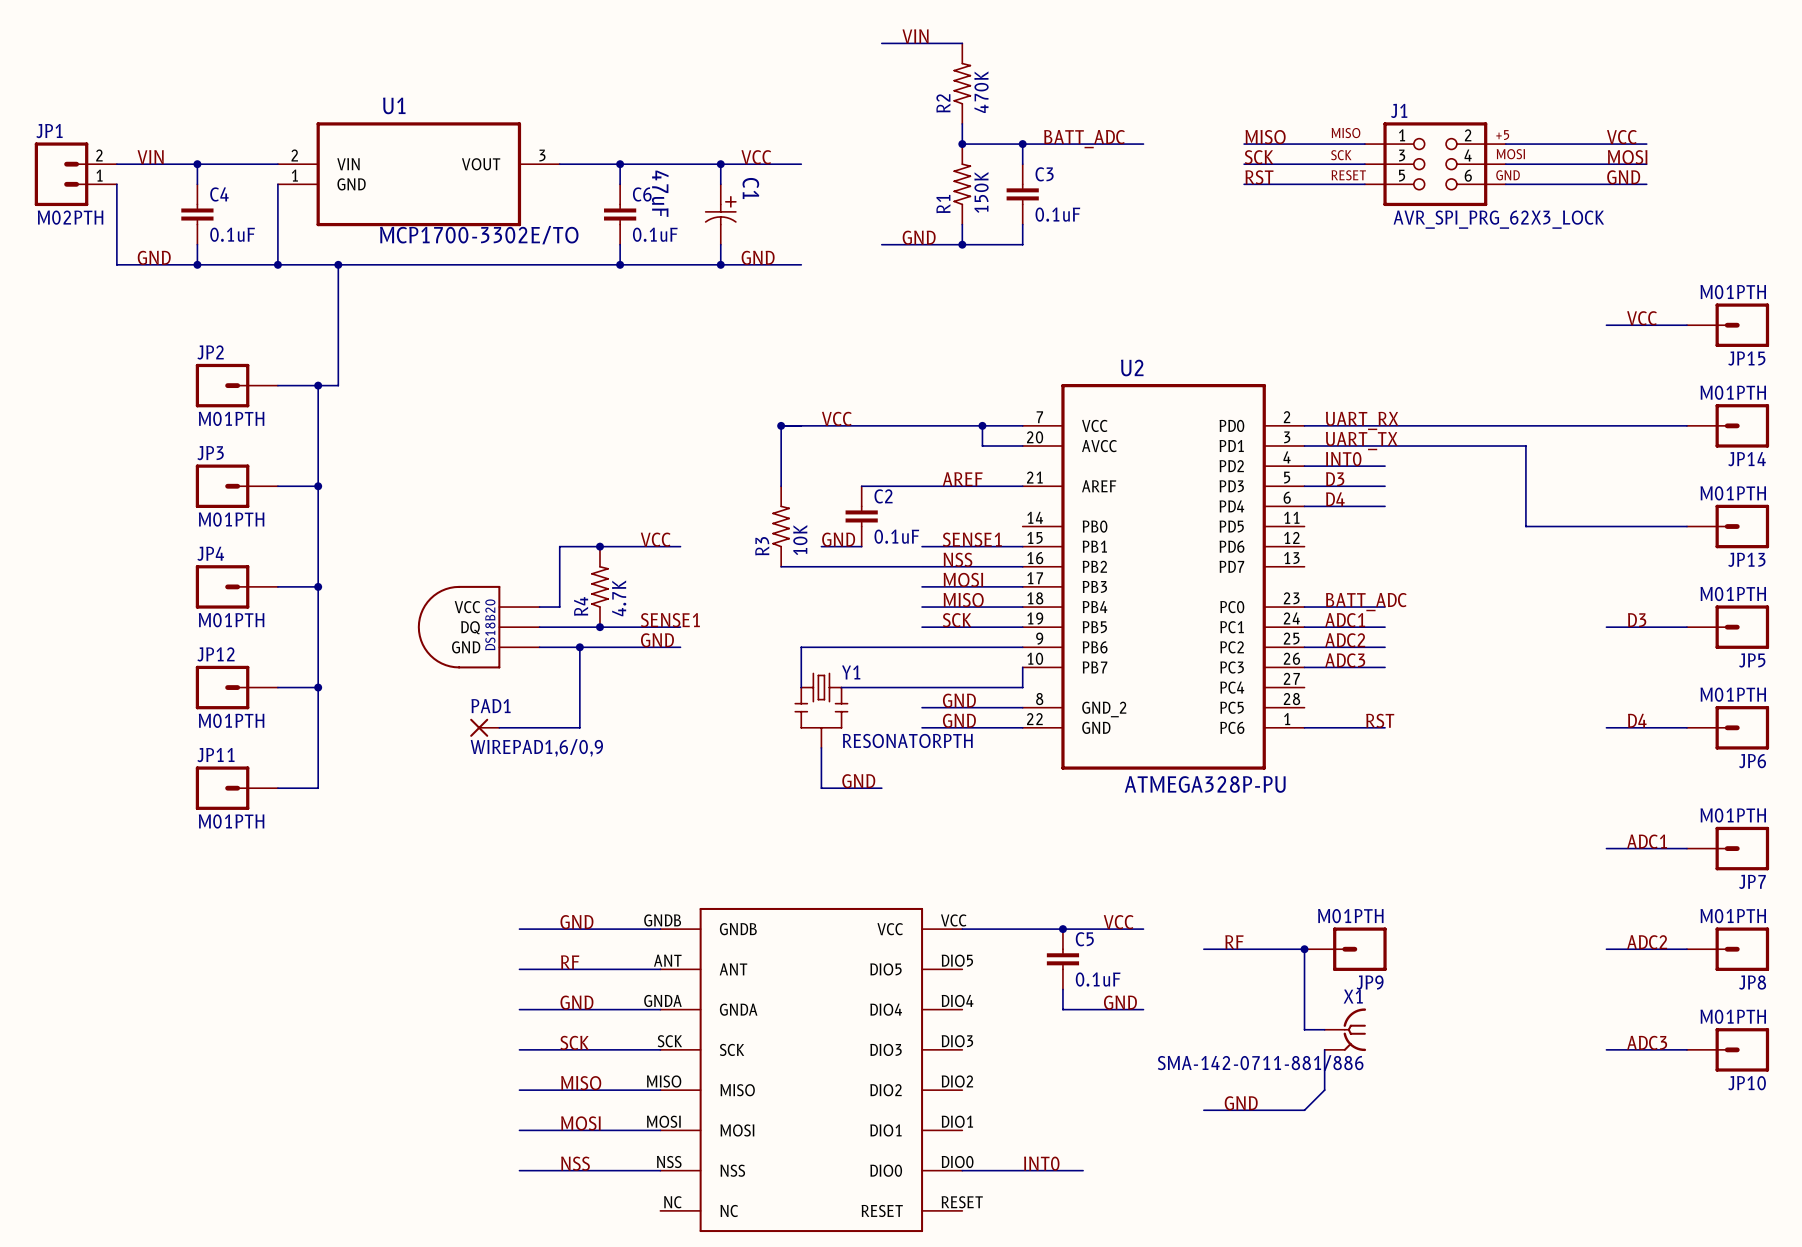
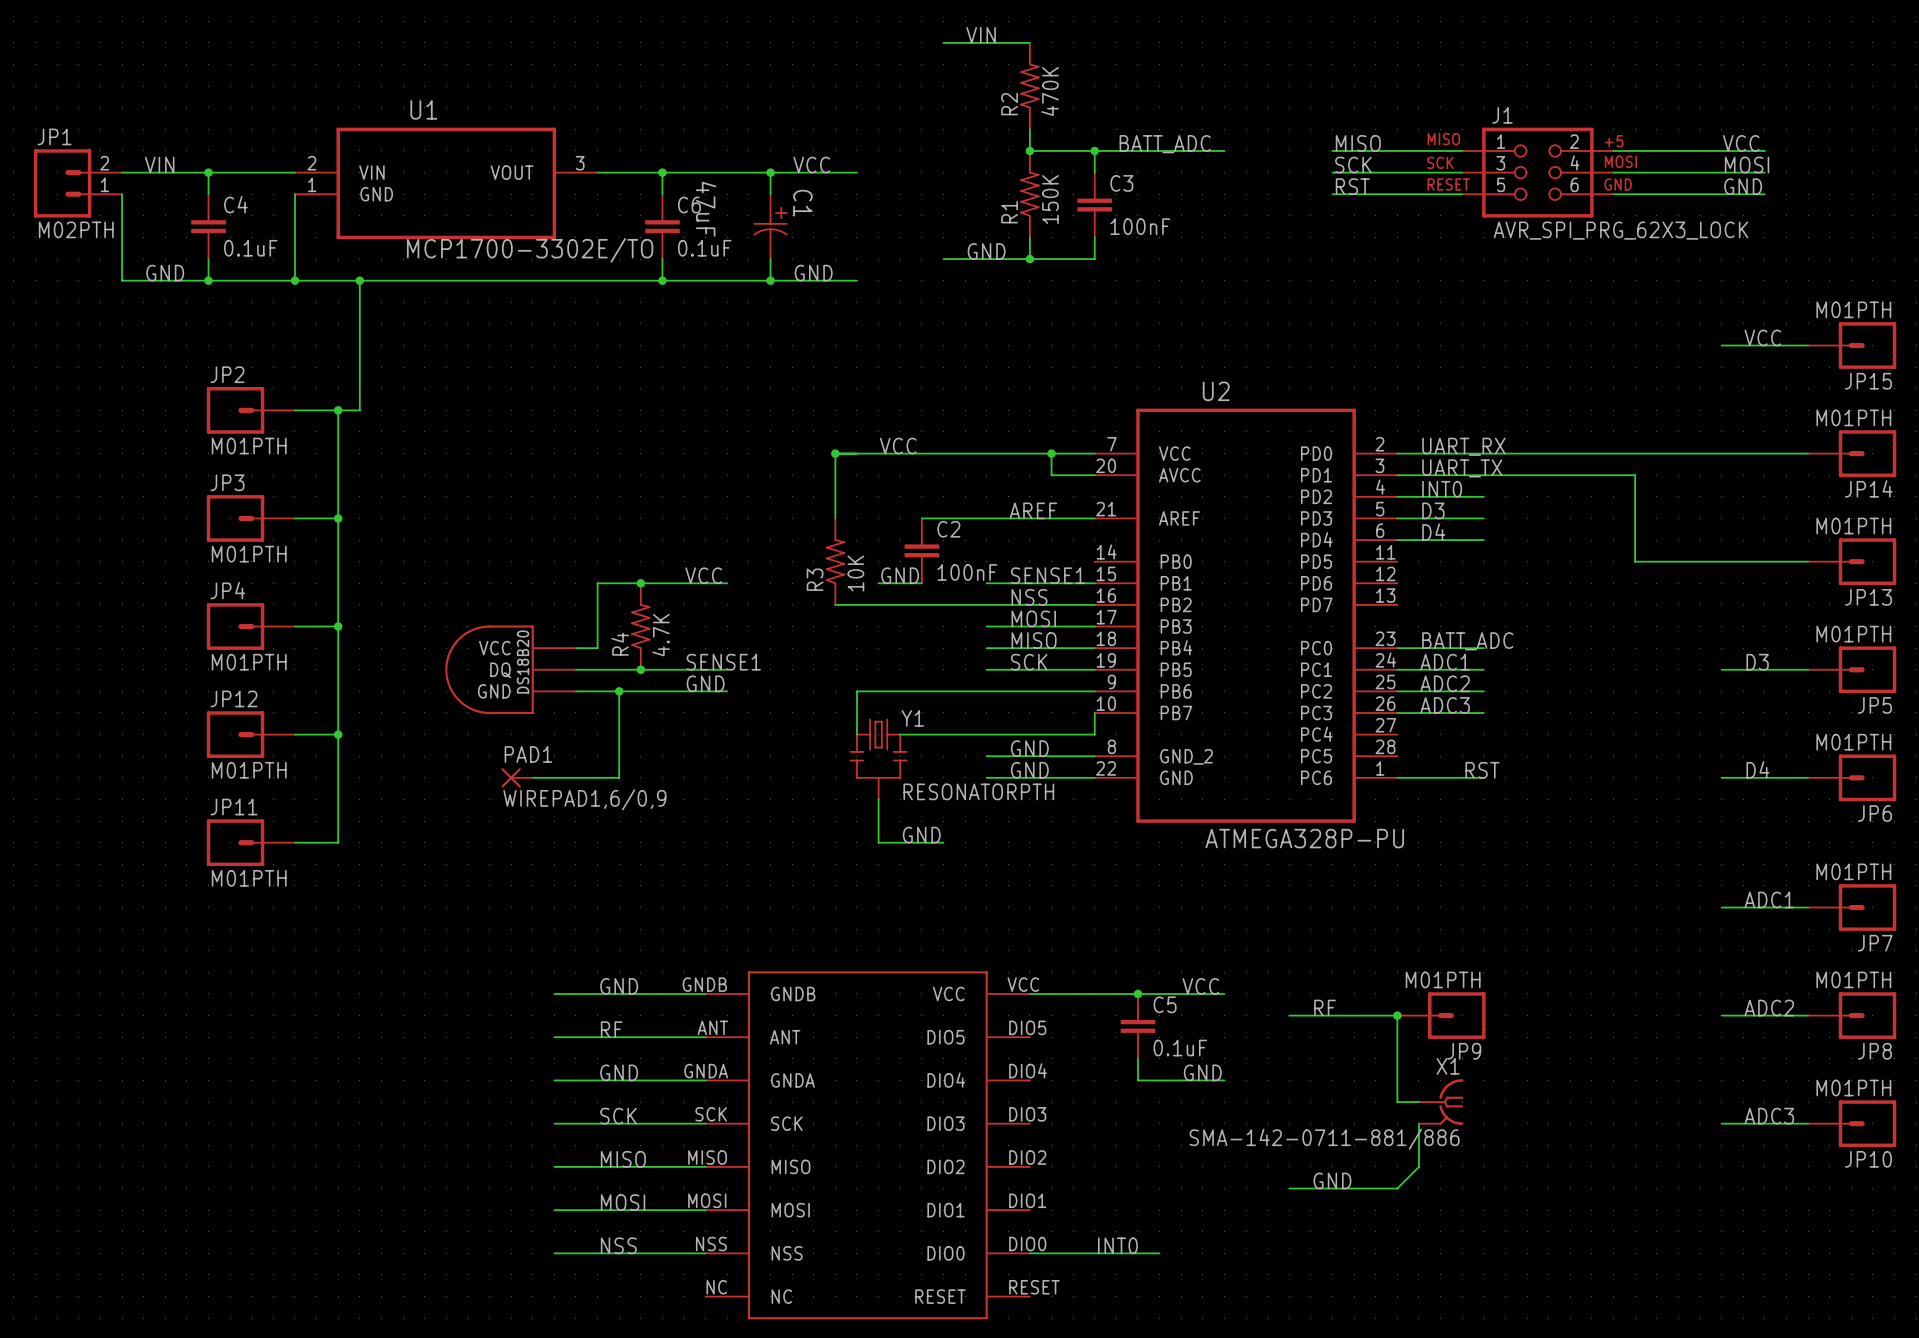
C3 value: 0.1uF (1057, 214) -> 100nF (1140, 226)
C2 value: 0.1uF (896, 536) -> 100nF (967, 572)

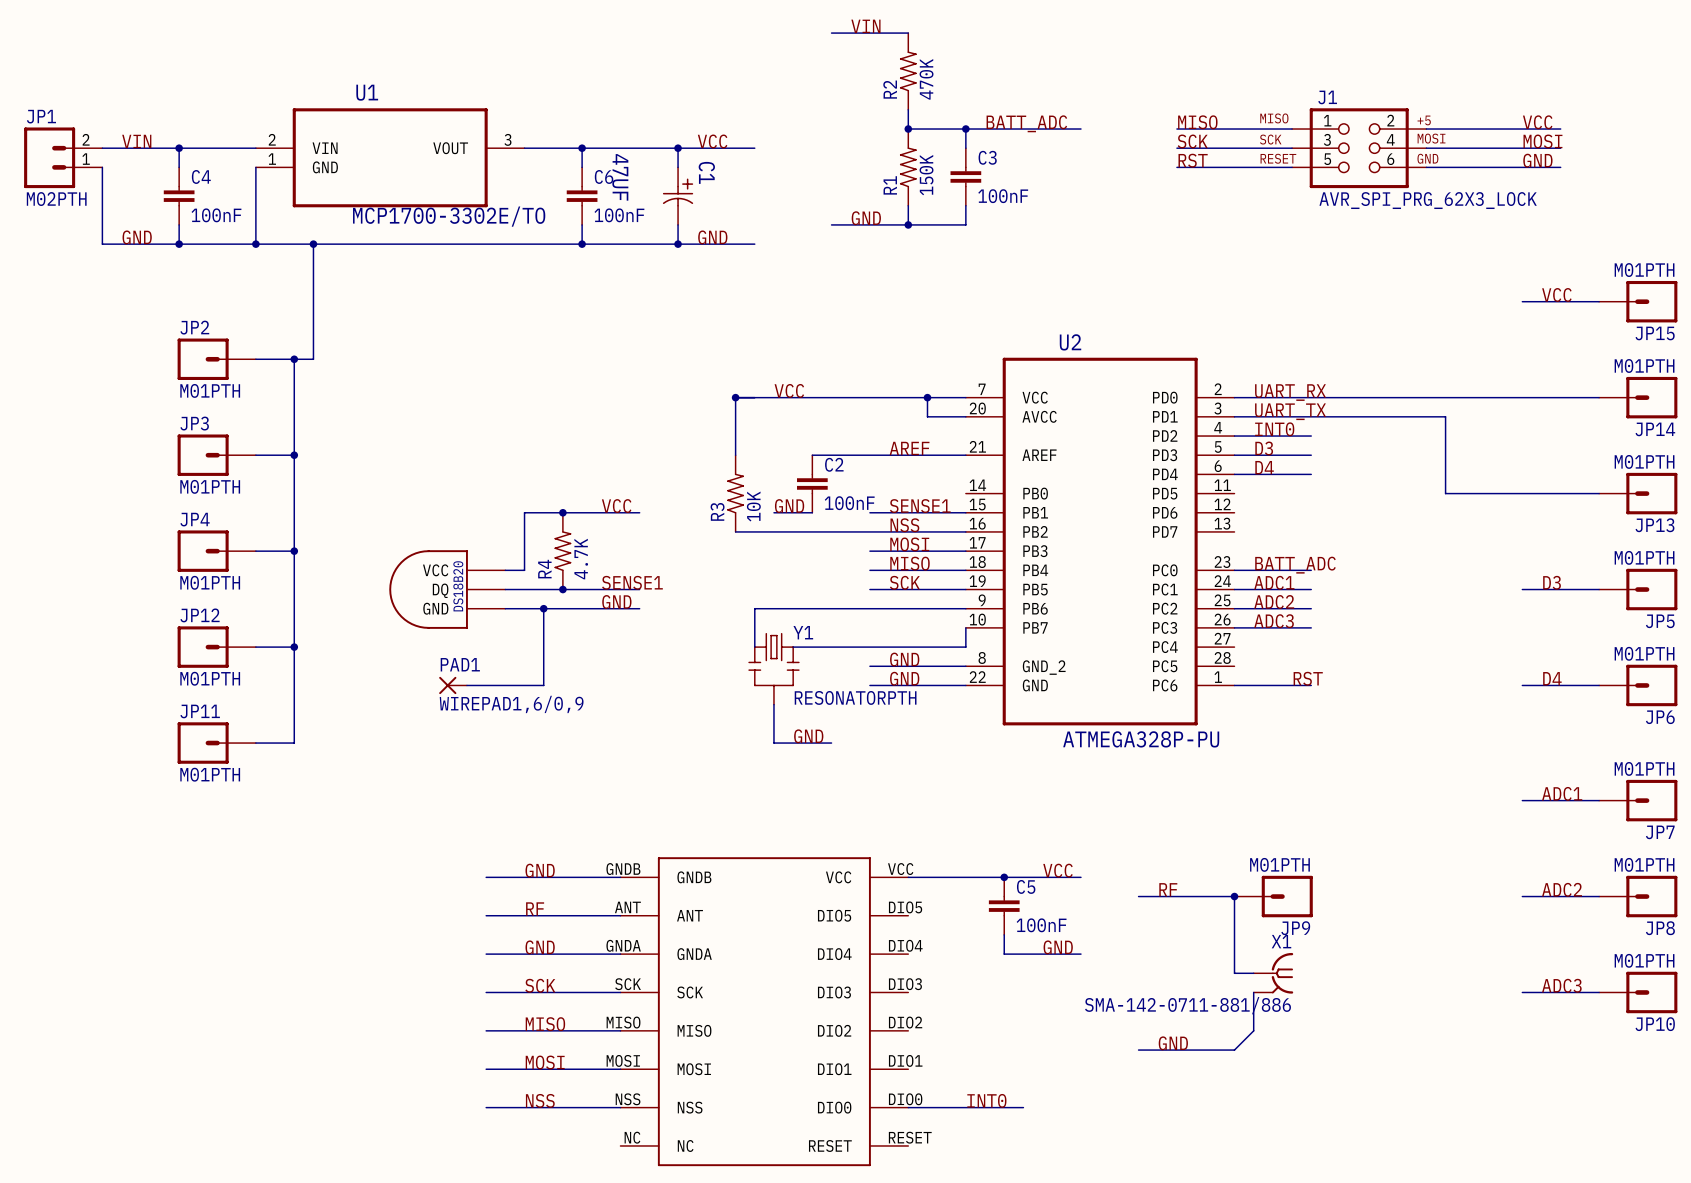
C1 value: 47uF (706, 209) -> 47UF (620, 177)
C4 value: 0.1uF (250, 248) -> 100nF (216, 215)
C6 value: 0.1uF (704, 248) -> 100nF (619, 215)
C5 value: 0.1uF (1180, 1048) -> 100nF (1041, 925)

